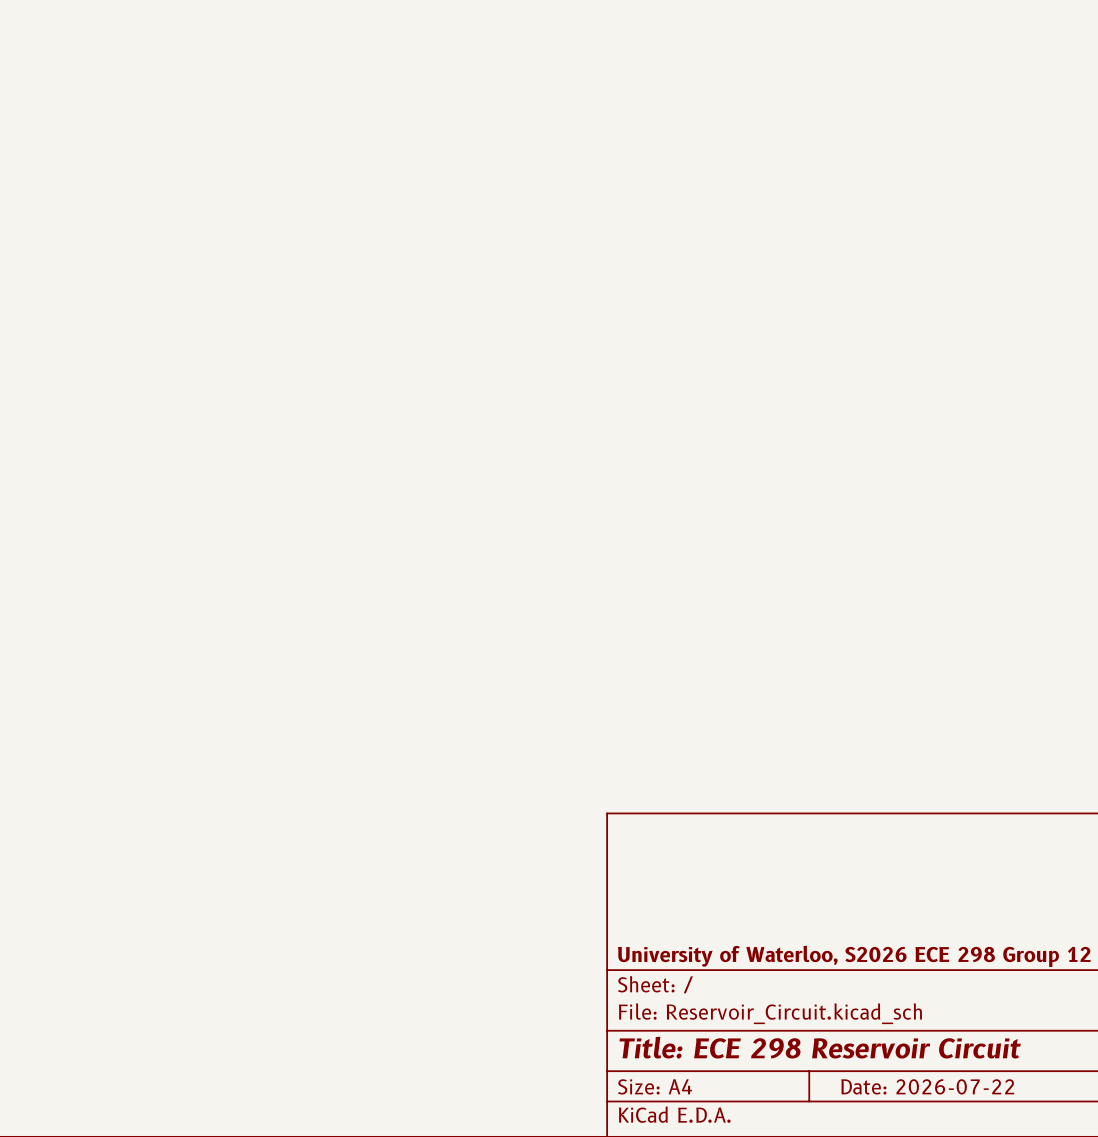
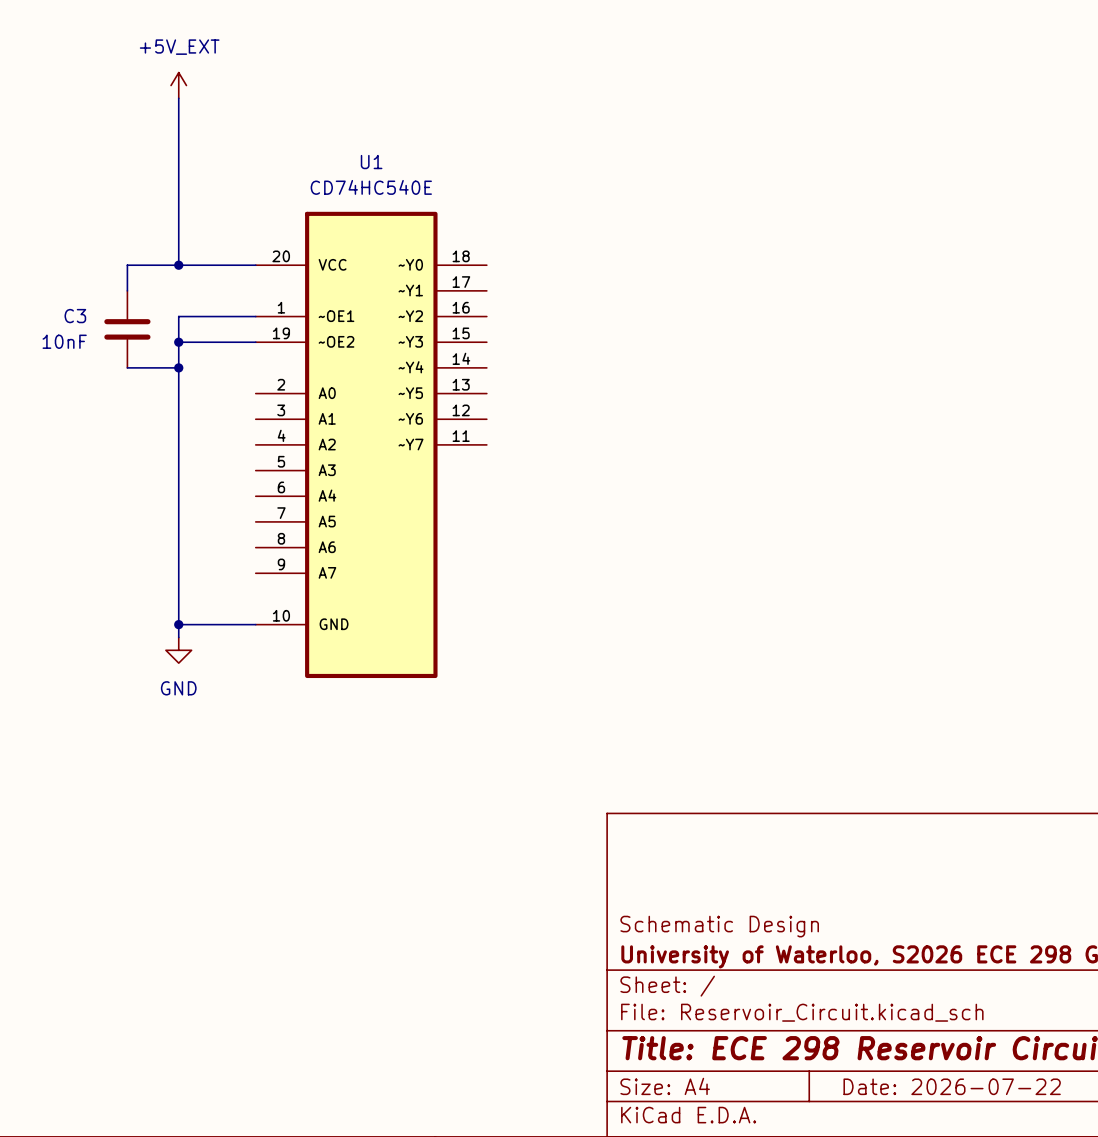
power symbol: none -> +5V_EXT (178, 85)
wire: none -> (178, 98) (178, 265)
junction: none -> (178, 265)
wire: none -> (255, 265) (127, 265) (127, 290)
wire: none -> (255, 316) (178, 316) (178, 637)
C3: none -> 10nF (127, 329)
wire: none -> (178, 342) (255, 342)
junction: none -> (178, 342)
wire: none -> (127, 367) (178, 367)
junction: none -> (178, 367)
U1: none -> CD74HC540E (371, 444)
wire: none -> (178, 624) (255, 624)
junction: none -> (178, 624)
power symbol: none -> GND (178, 650)
title block: none -> Schematic Design (719, 926)

